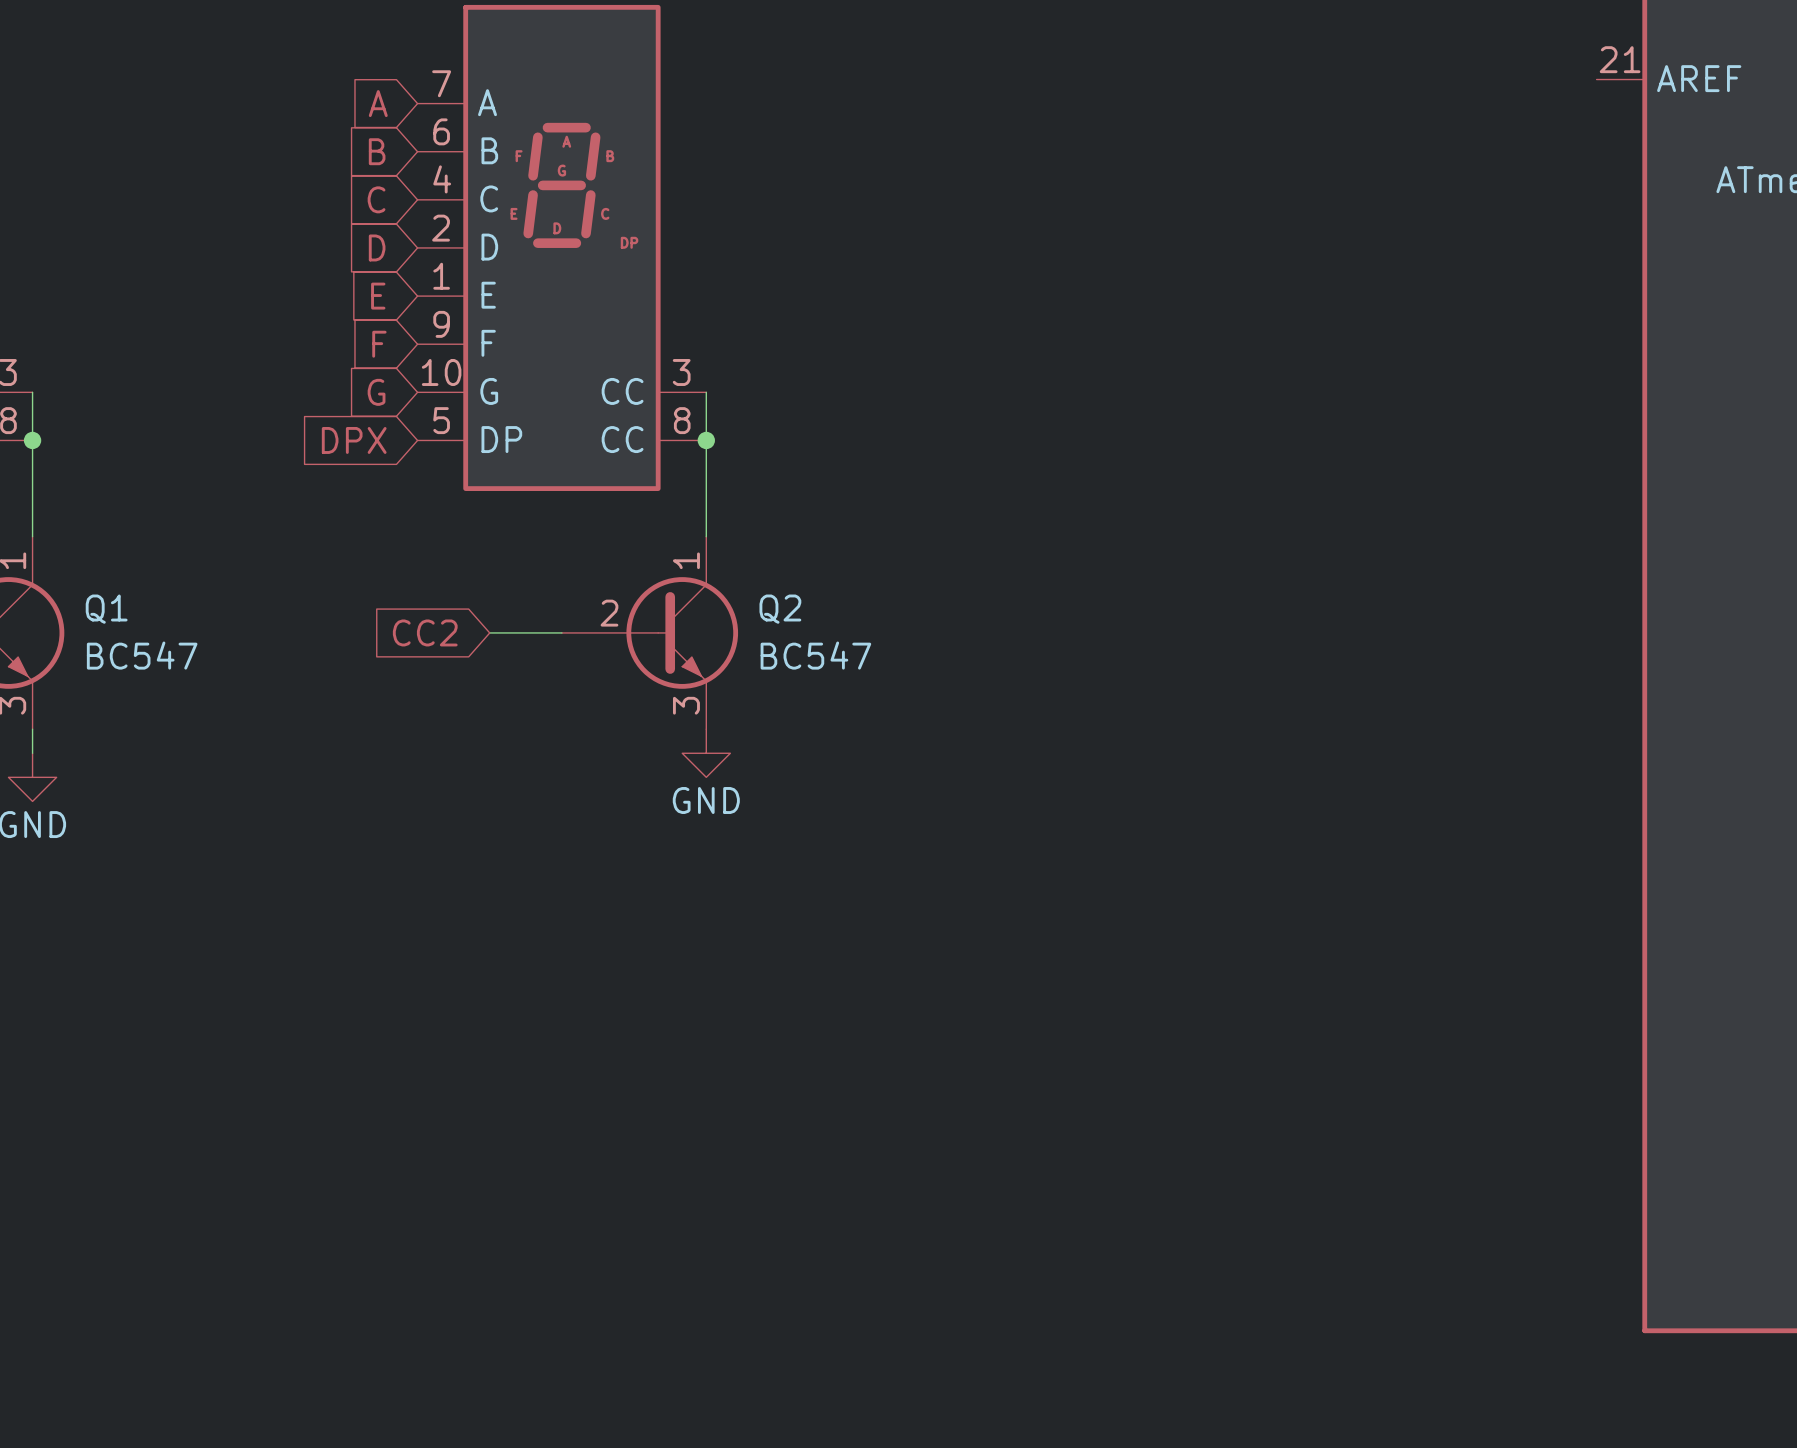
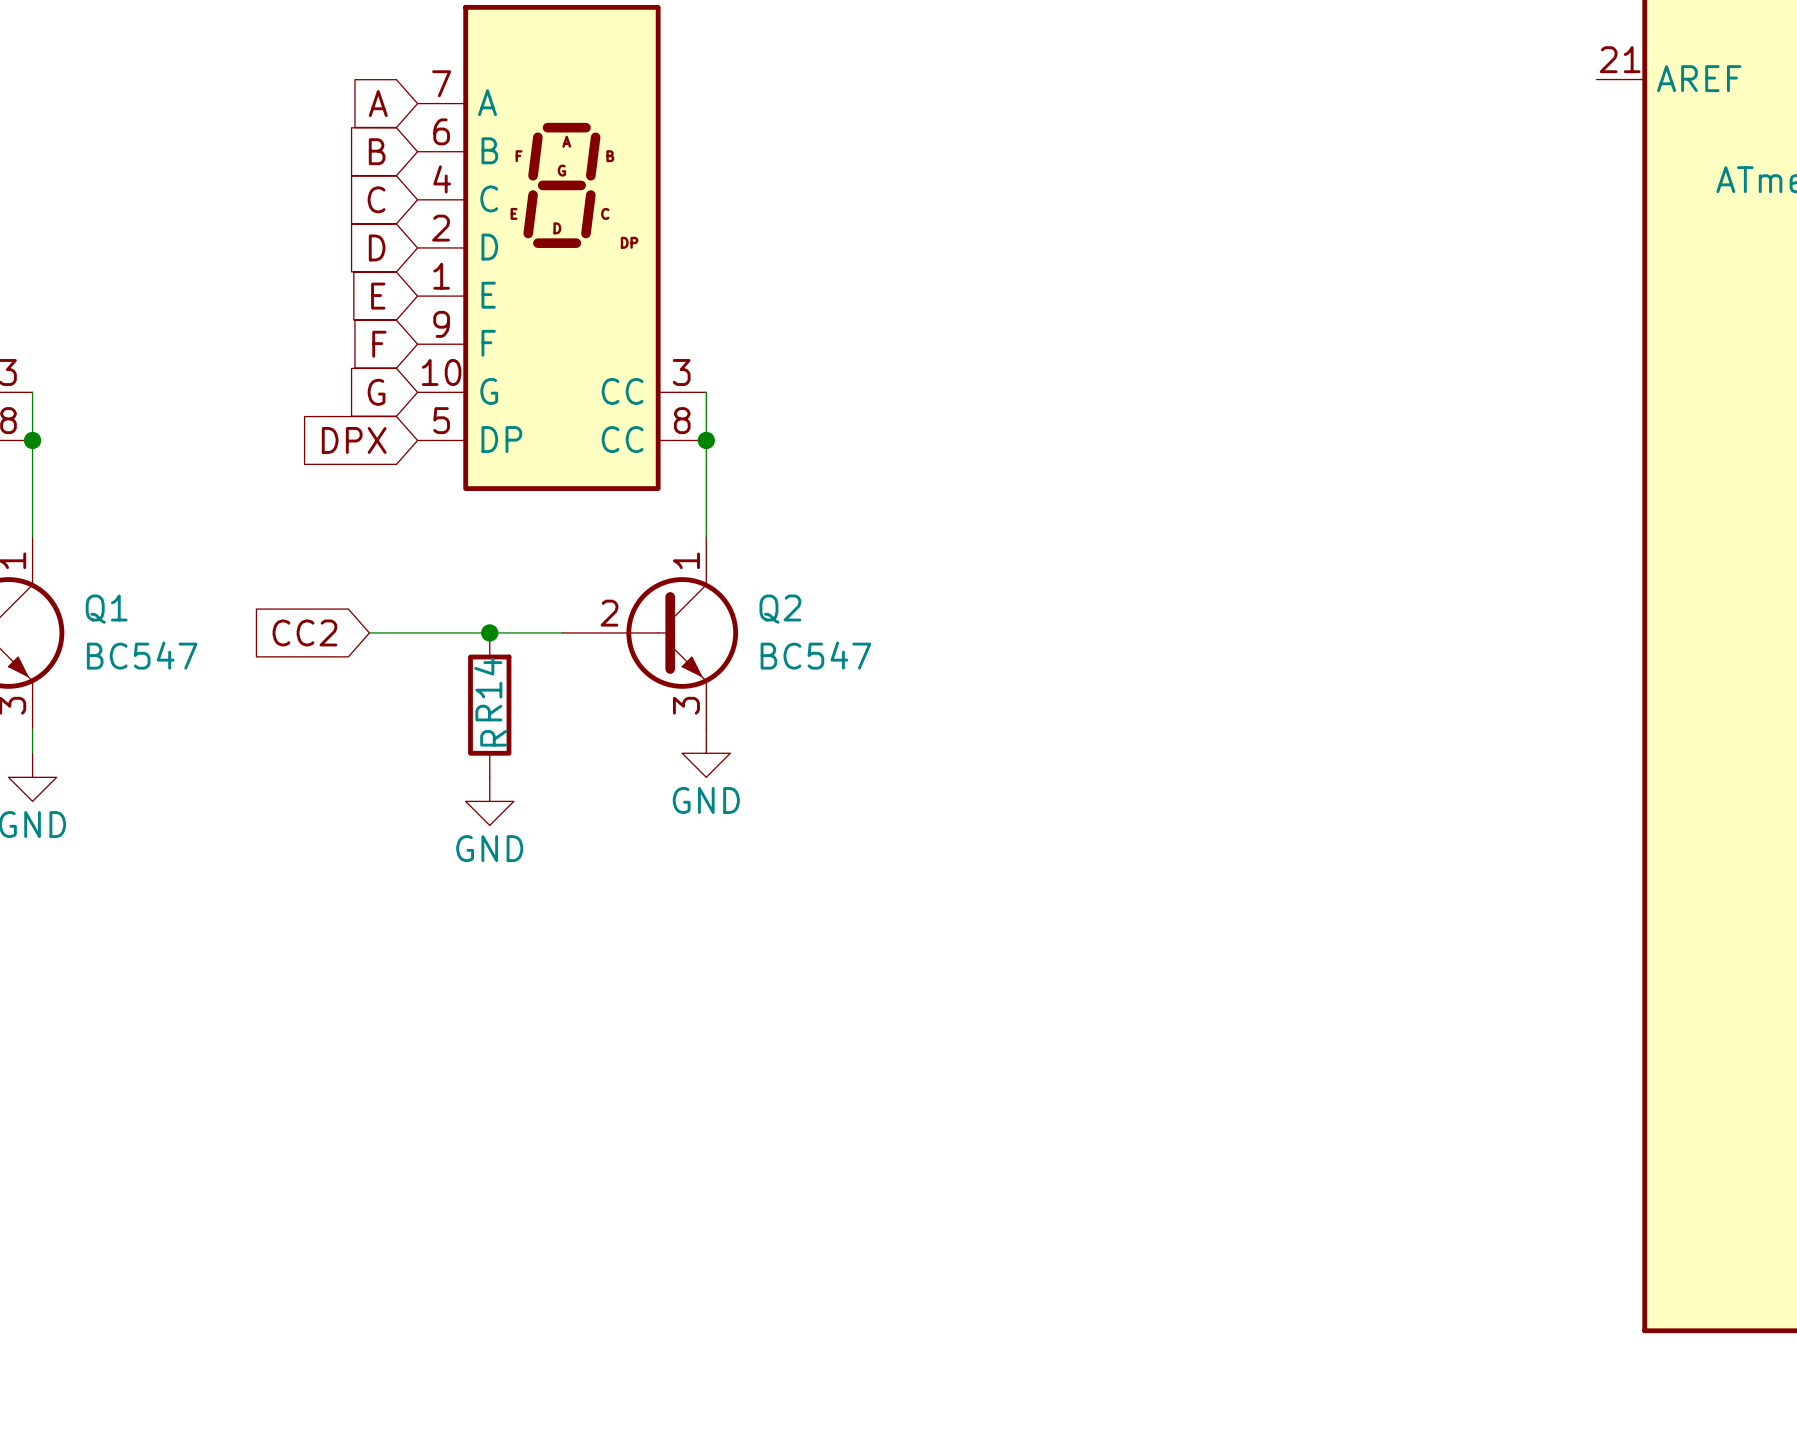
wire: none -> (369, 632) (489, 632)
global label position: CC2 (425, 632) -> CC2 (304, 632)
junction: none -> (489, 632)
R14: none -> R (489, 705)
power symbol: none -> GND (489, 801)

